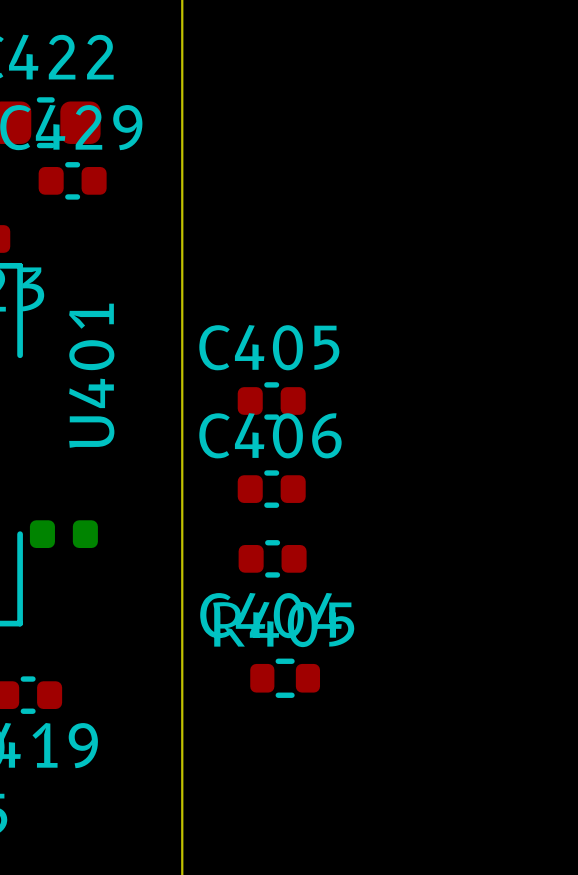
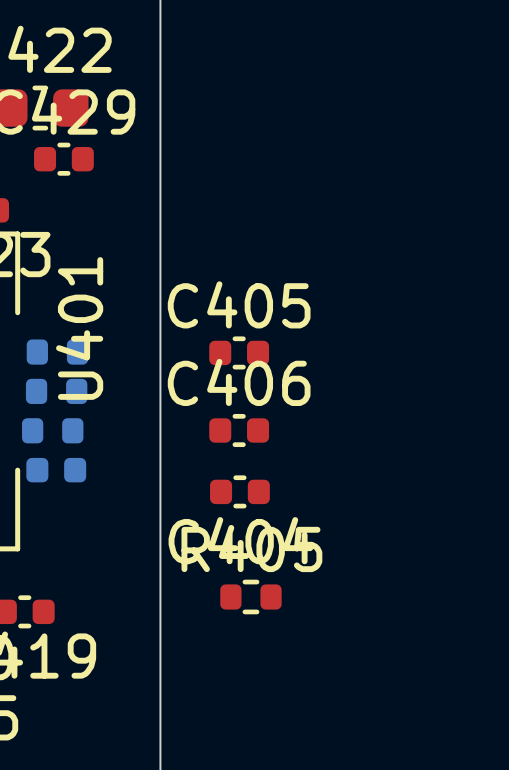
part: none -> (57, 352)
part: none -> (56, 391)
part: none -> (52, 430)

